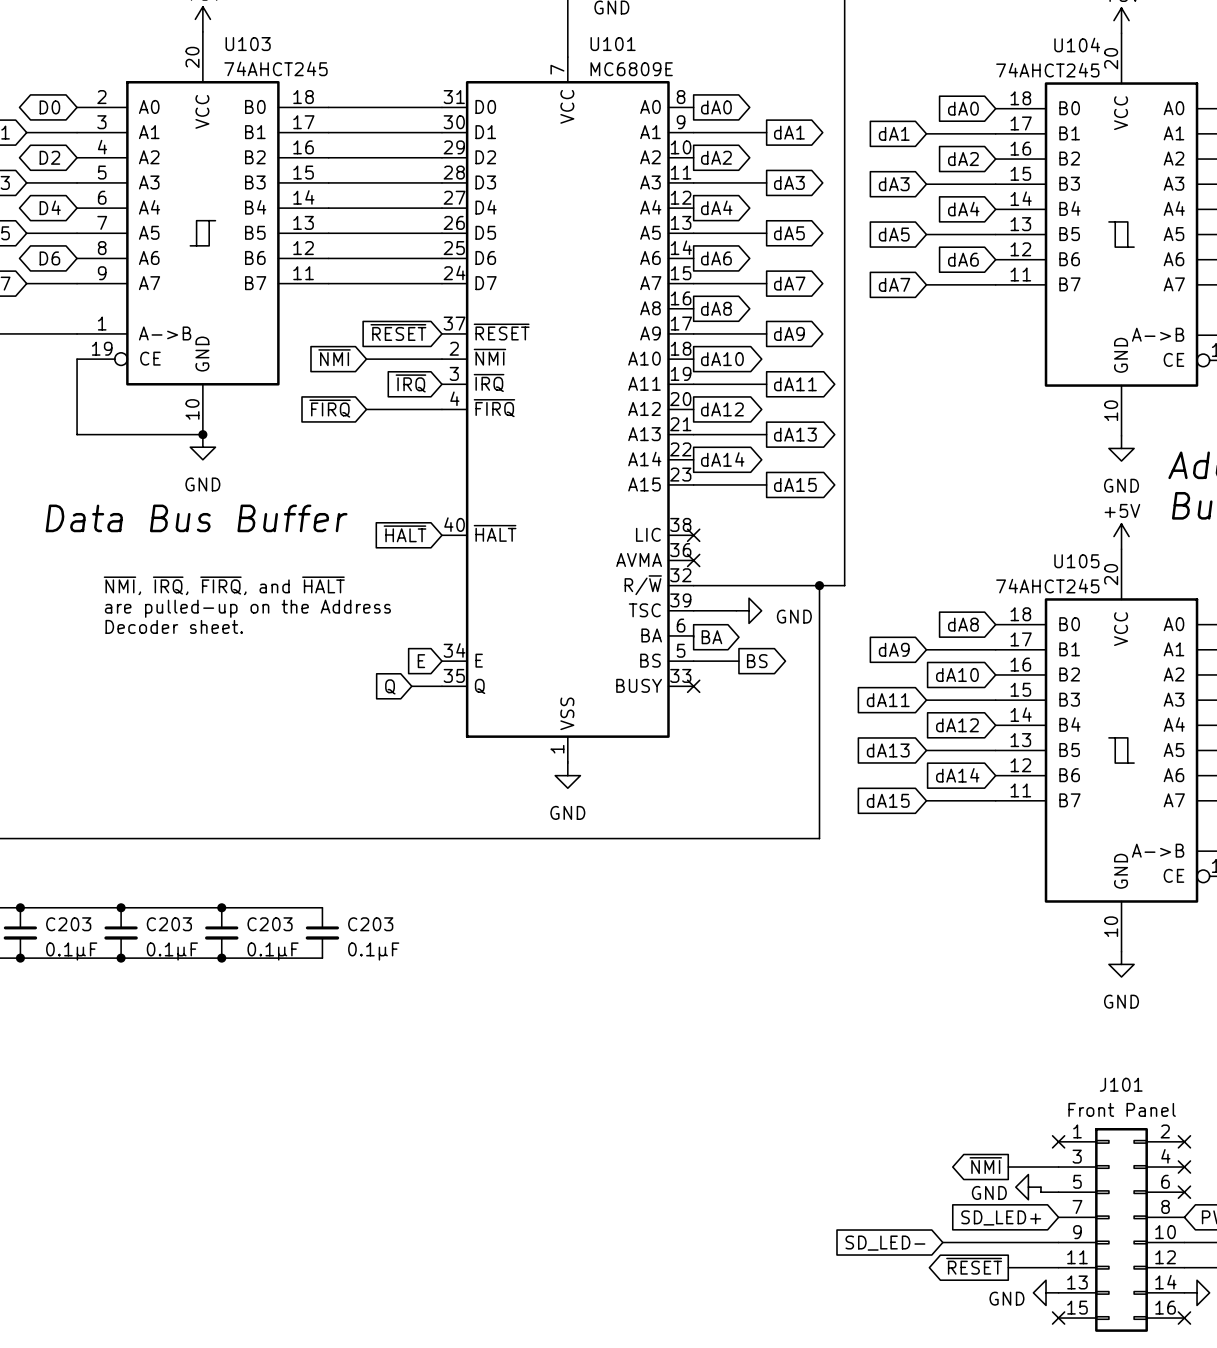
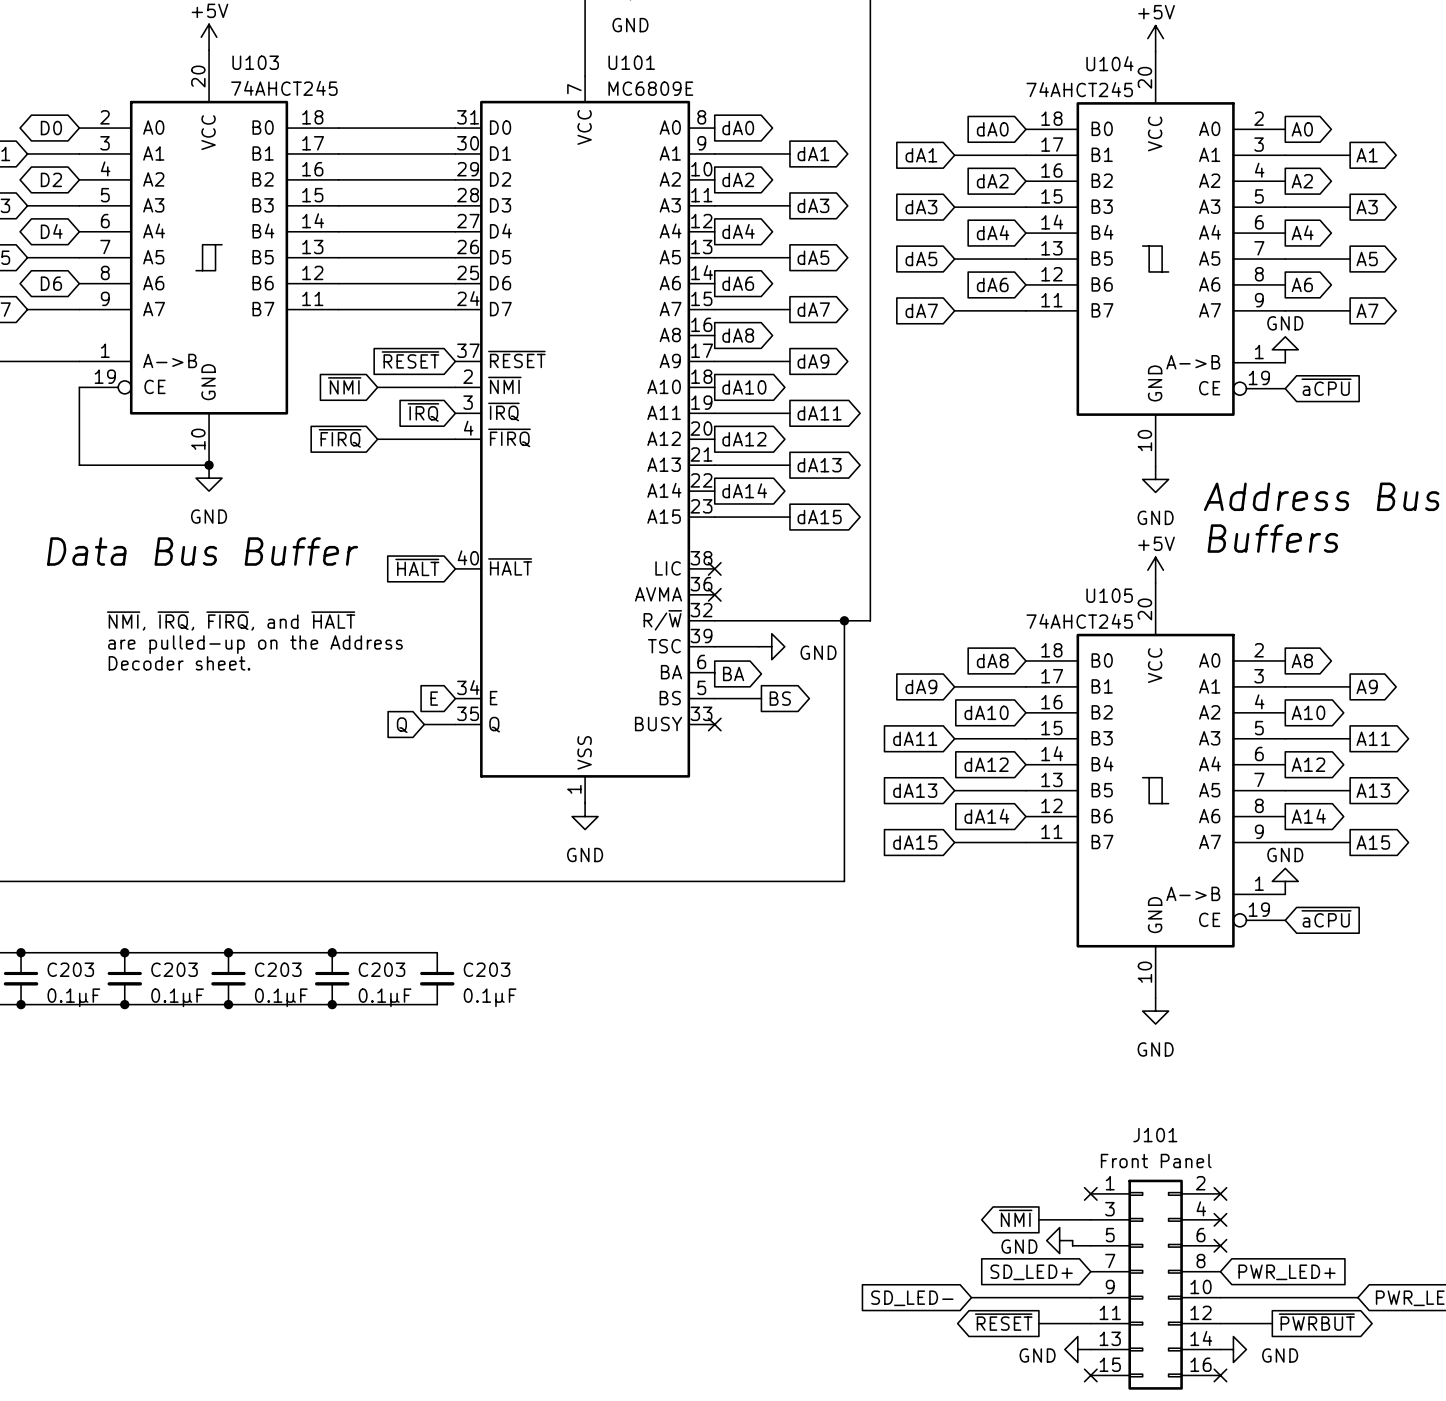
wire: none -> (332, 952) (437, 952)
junction: none -> (332, 952)
C203: none -> 0.1µF (437, 978)
wire: none -> (332, 1004) (437, 1004)
junction: none -> (332, 1004)

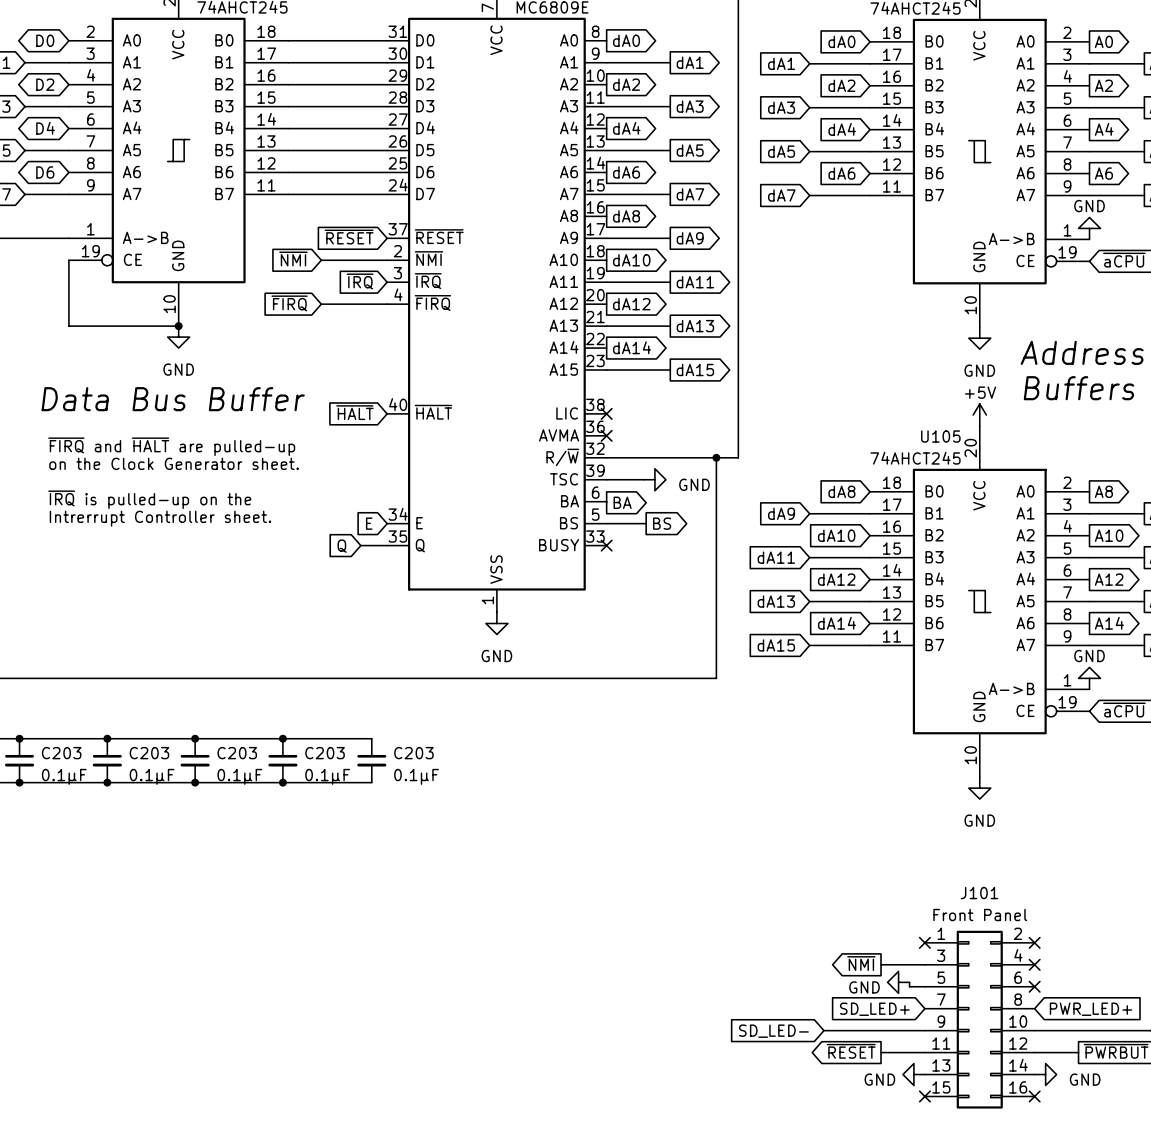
text: none -> ~{FIRQ} and ~{HALT} are pulled-up (171, 446)
text: ~{NMI}, ~{IRQ}, ~{FIRQ}, and ~{HALT} (231, 621) -> none
text: none -> on the Clock Generator sheet. (174, 463)
text: are pulled-up on the Address (255, 644) -> ~{IRQ} is pulled-up on the (149, 499)
text: Decoder sheet. (179, 663) -> none
text: none -> Intrerrupt Controller sheet. (160, 518)

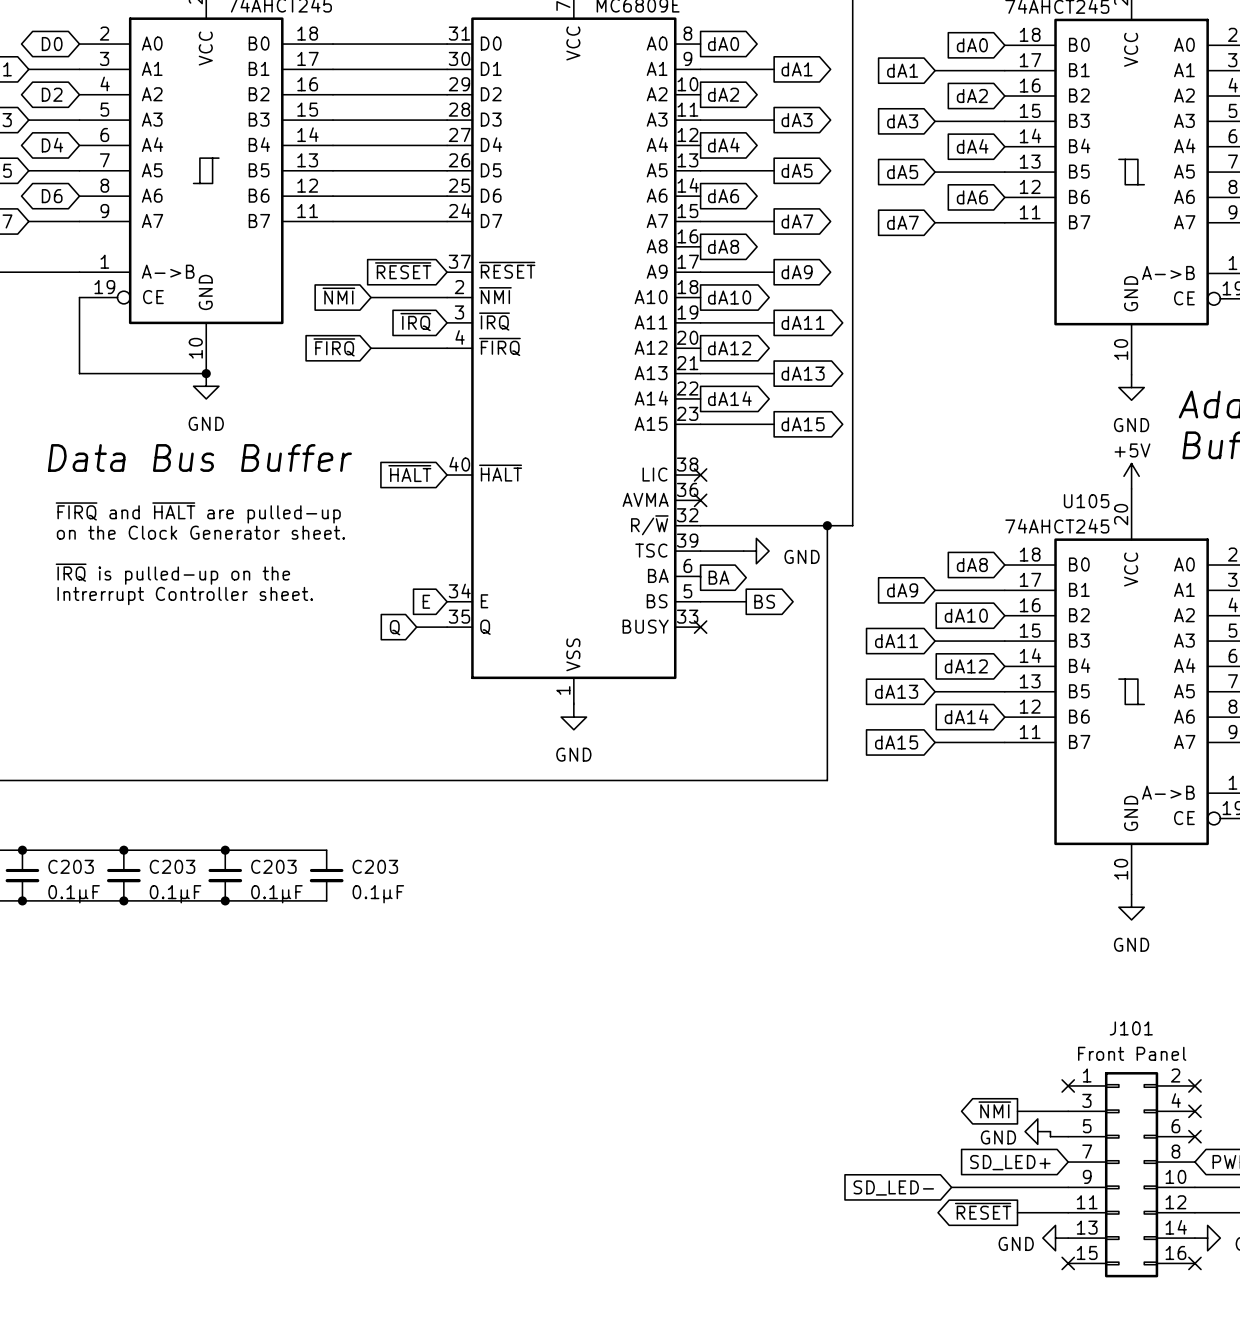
wire: (282, 738) (371, 738) -> none
junction: (282, 738) -> none
C203: 0.1µF (371, 760) -> none
wire: (282, 782) (371, 782) -> none
junction: (282, 782) -> none

